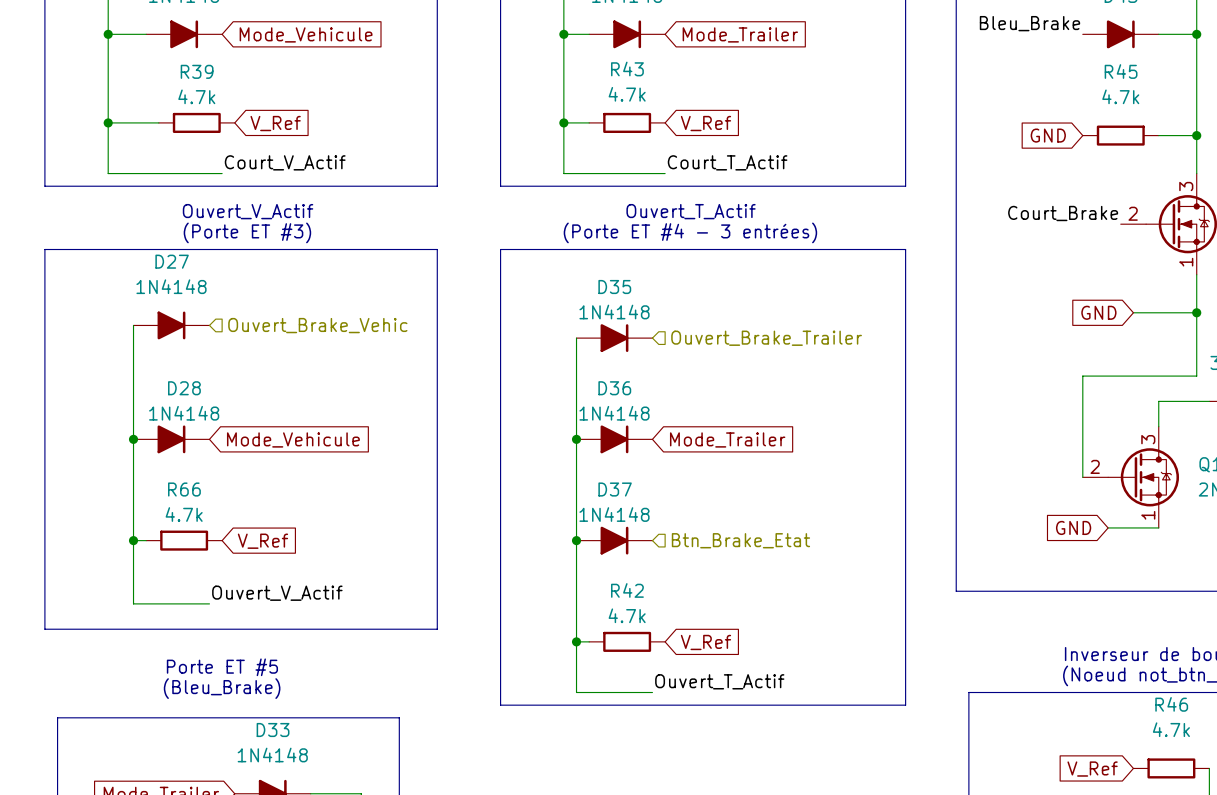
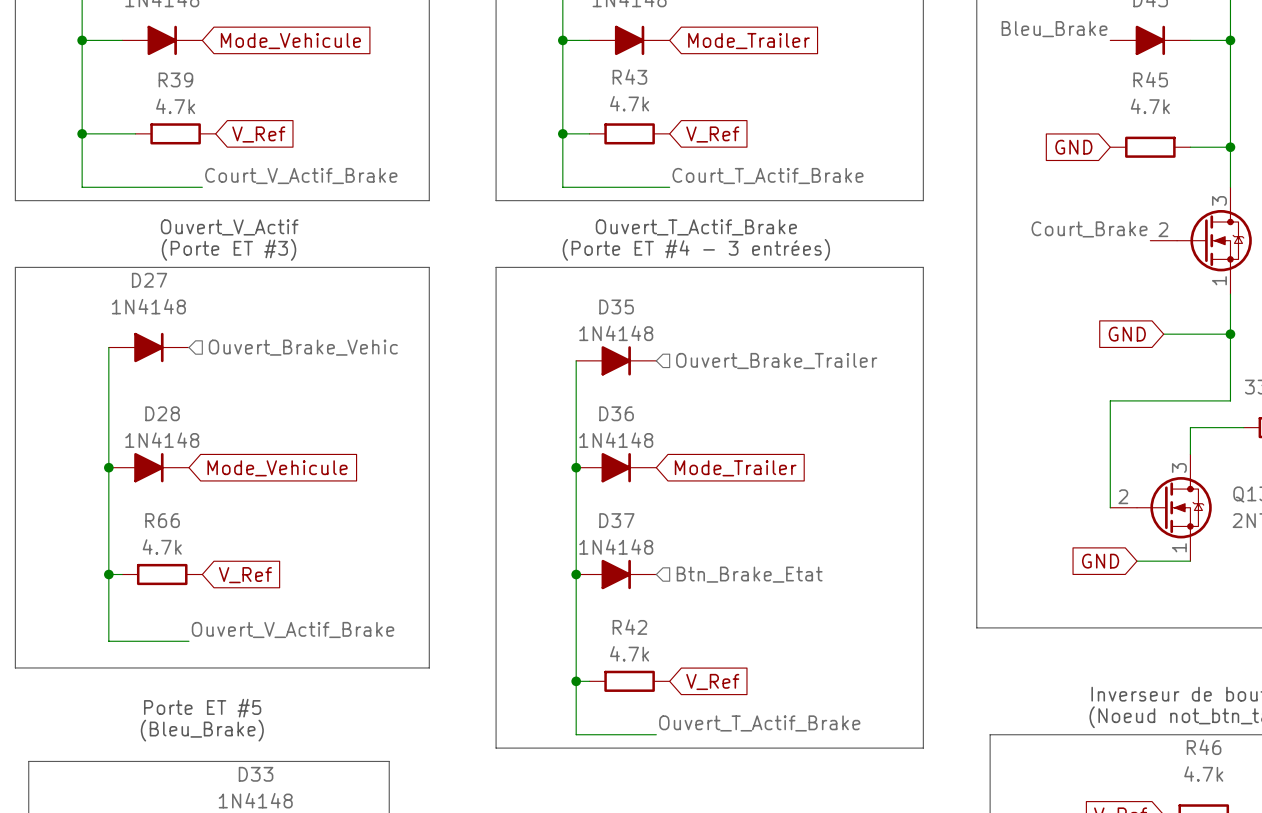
label: Court_V_Actif (285, 162) -> Court_V_Actif_Brake (301, 176)
label: Court_T_Actif (727, 162) -> Court_T_Actif_Brake (767, 176)
text: Ouvert_T_Actif (691, 211) -> Ouvert_T_Actif_Brake (696, 227)
label: Ouvert_V_Actif (277, 593) -> Ouvert_V_Actif_Brake (293, 629)
label: Ouvert_T_Actif (719, 681) -> Ouvert_T_Actif_Brake (759, 723)

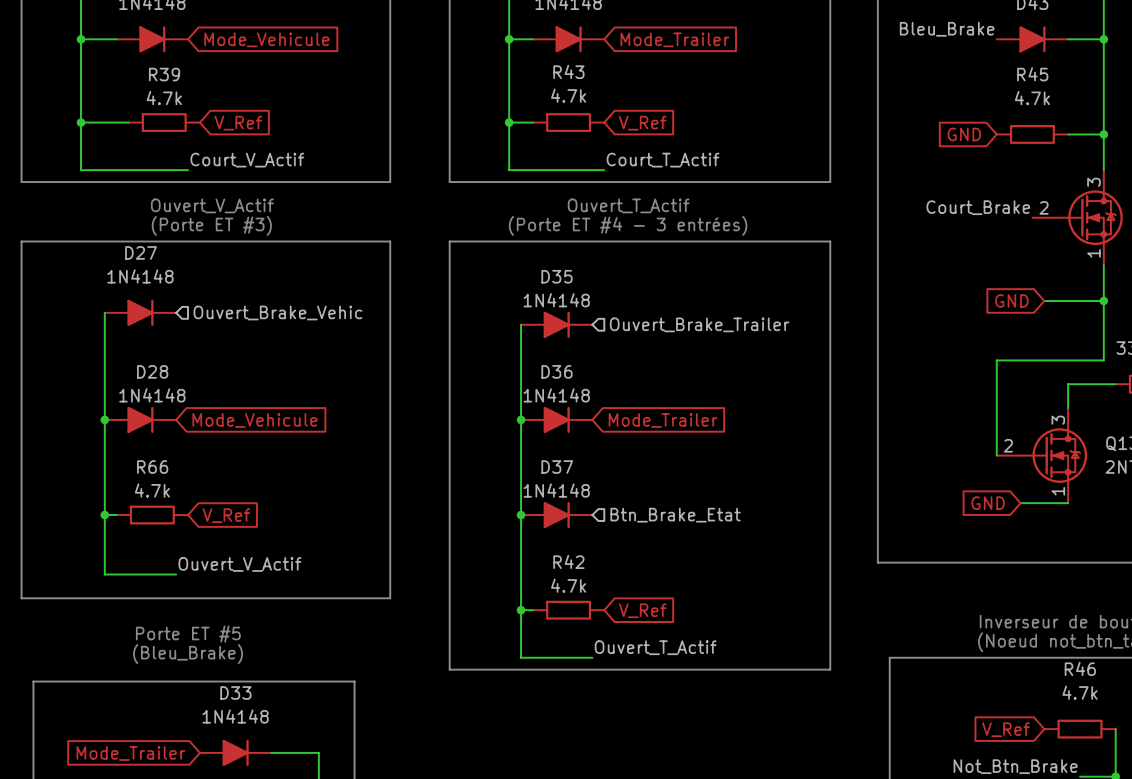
label: Court_V_Actif_Brake (301, 176) -> Court_V_Actif (247, 160)
label: Court_T_Actif_Brake (767, 176) -> Court_T_Actif (663, 160)
text: Ouvert_T_Actif_Brake (696, 227) -> Ouvert_T_Actif (628, 205)
label: Ouvert_V_Actif_Brake (293, 629) -> Ouvert_V_Actif (239, 564)
label: Ouvert_T_Actif_Brake (759, 723) -> Ouvert_T_Actif (655, 647)

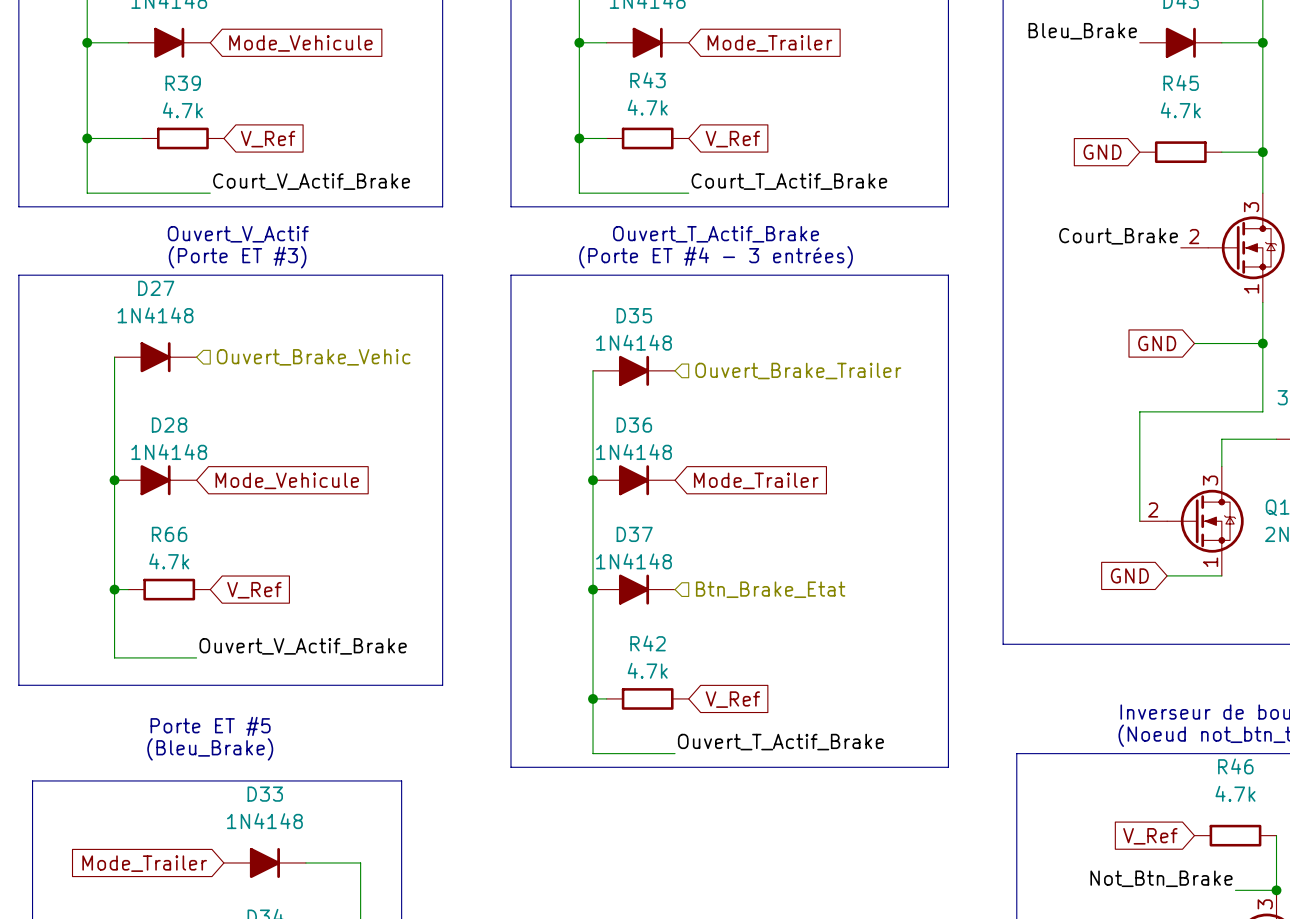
label: Court_V_Actif (247, 160) -> Court_V_Actif_Brake (311, 181)
label: Court_T_Actif (663, 160) -> Court_T_Actif_Brake (789, 181)
text: Ouvert_T_Actif (628, 205) -> Ouvert_T_Actif_Brake (716, 234)
label: Ouvert_V_Actif (239, 564) -> Ouvert_V_Actif_Brake (303, 646)
label: Ouvert_T_Actif (655, 647) -> Ouvert_T_Actif_Brake (780, 742)

